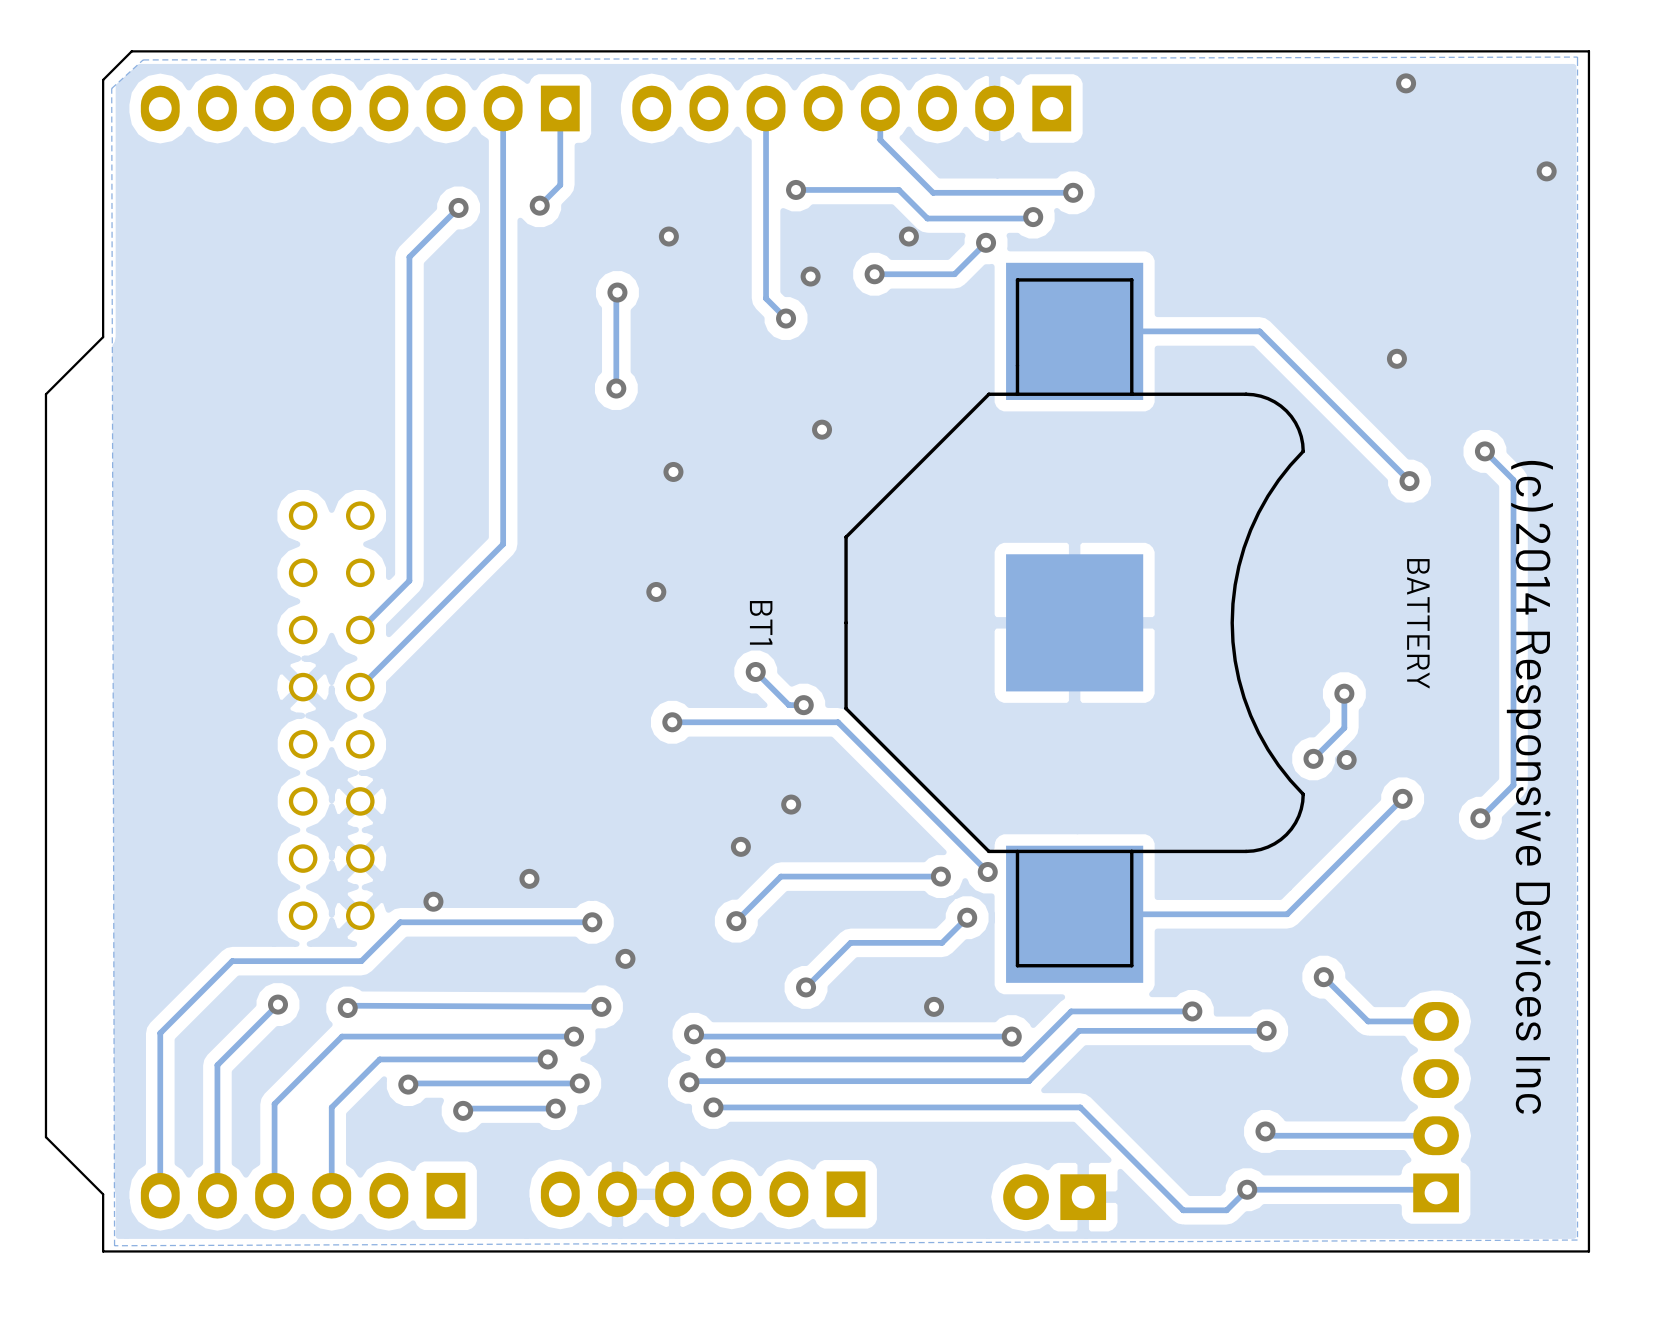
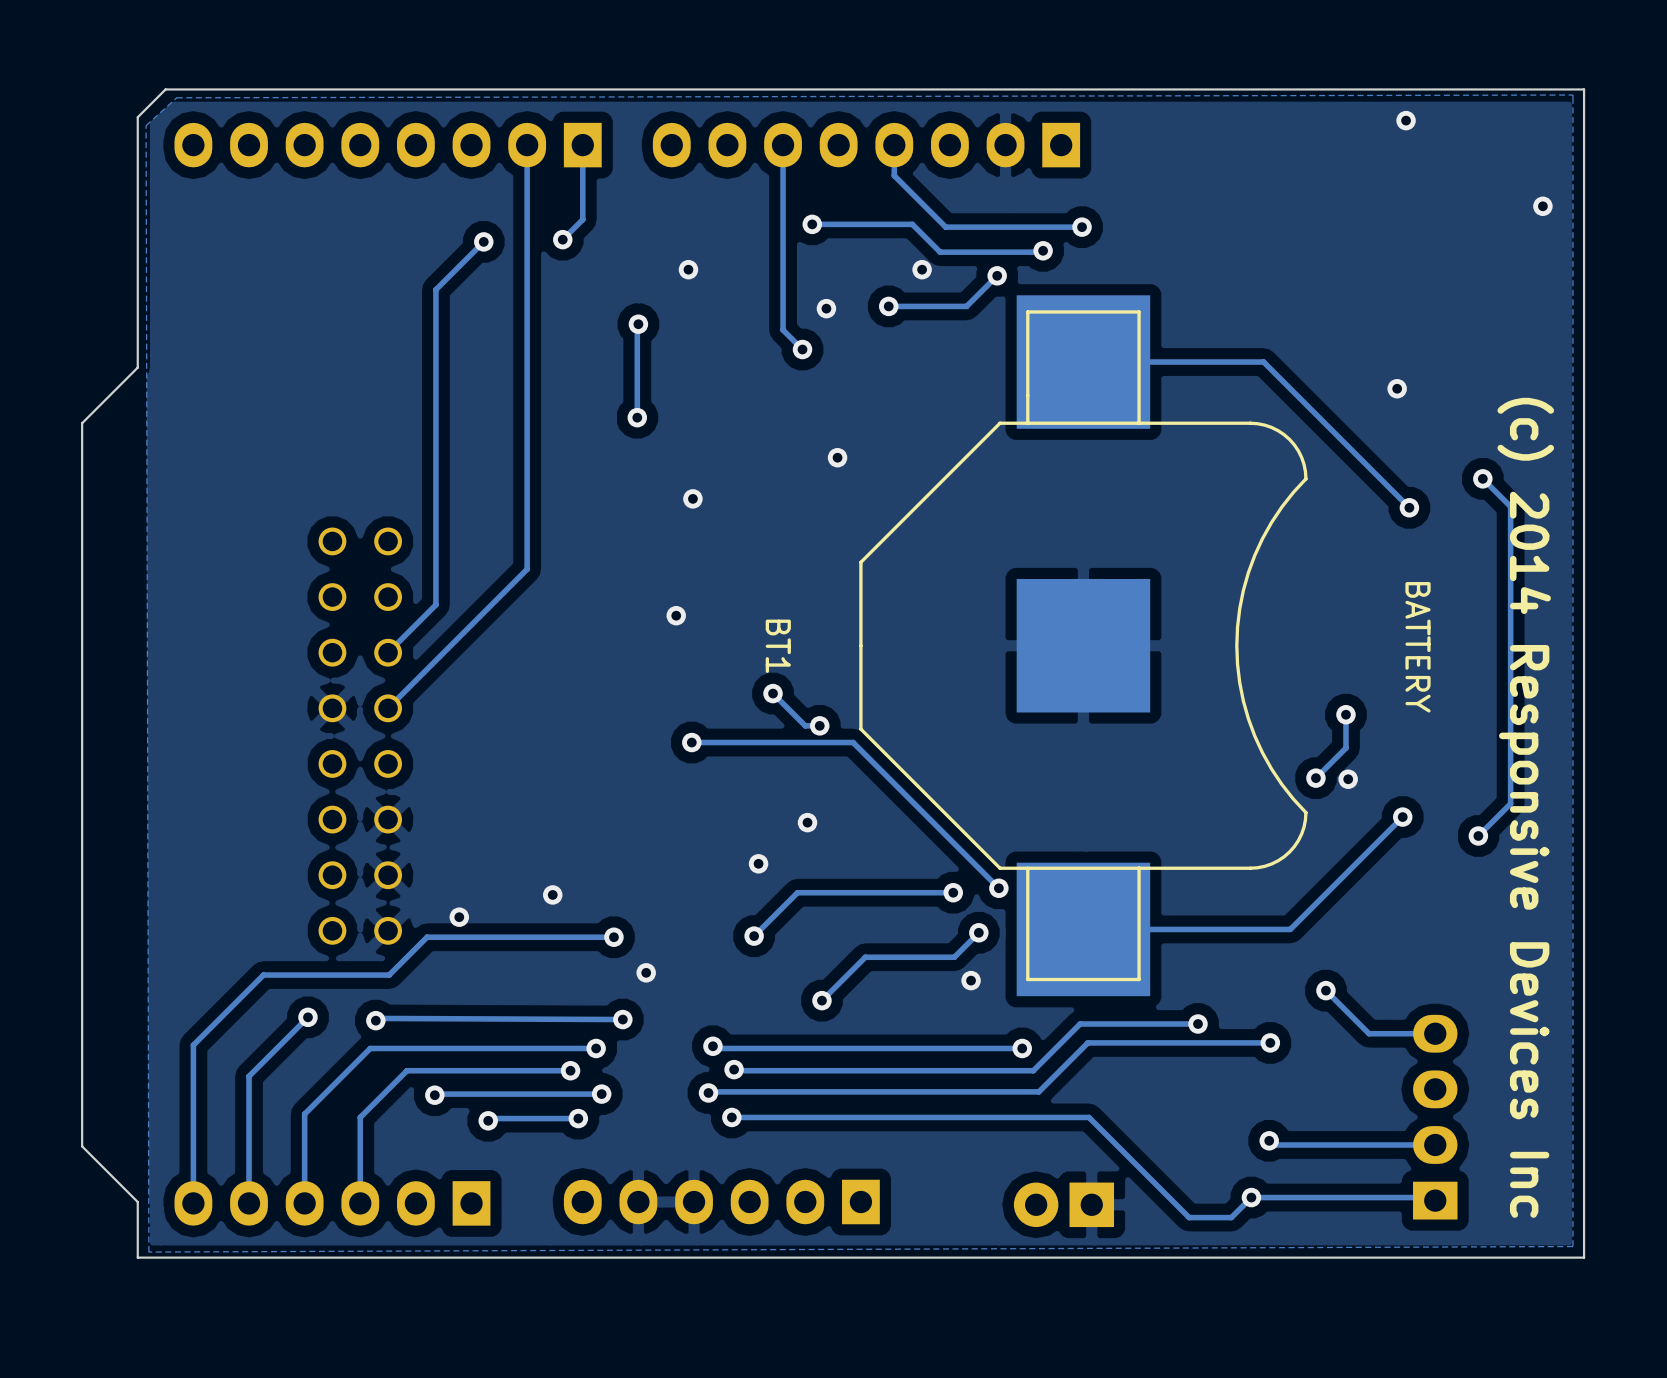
via position: (934, 1006) -> (971, 980)

